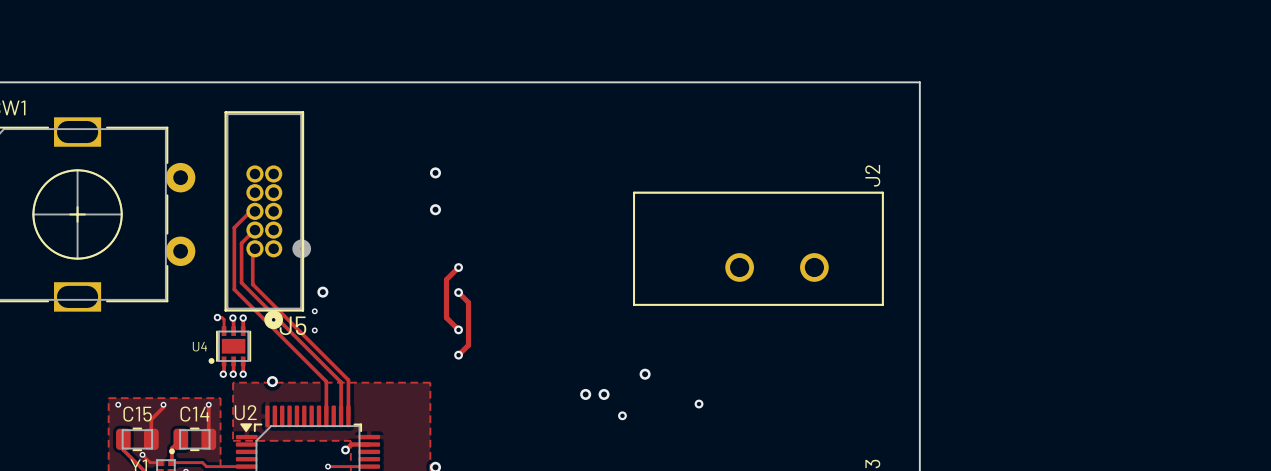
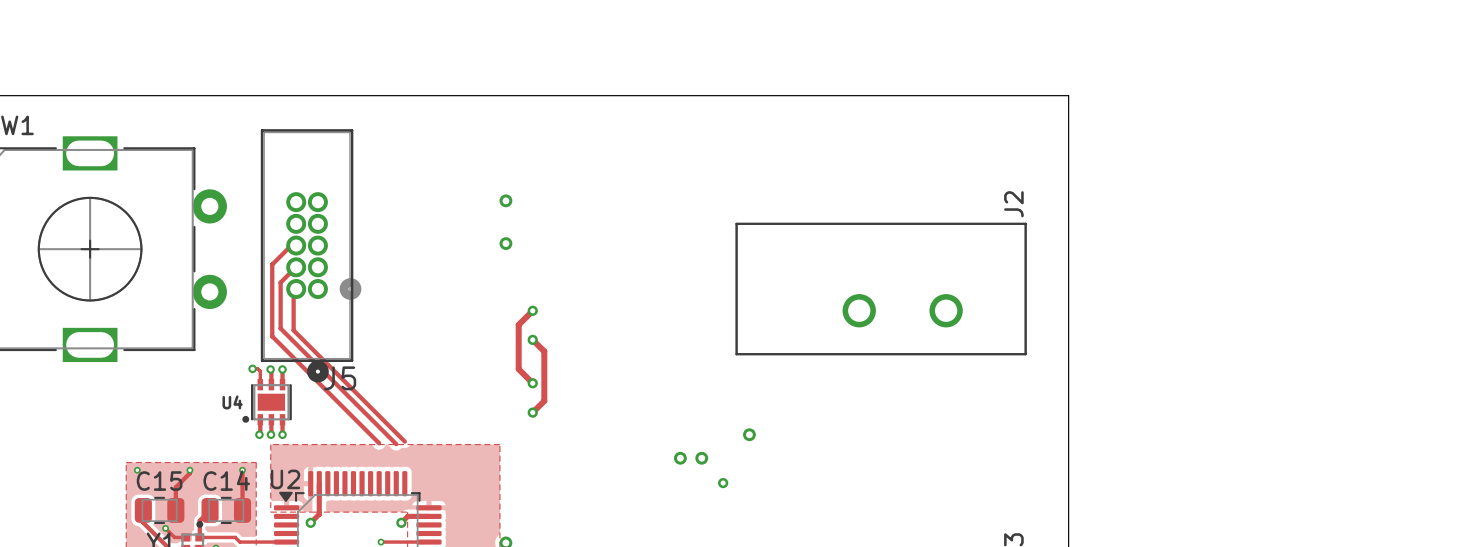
via: (322, 292) -> none
via: (314, 311) -> none
via: (314, 330) -> none
track: (348, 380) (348, 416) -> none
via: (272, 381) -> none
track: (326, 381) (326, 416) -> none
track: (341, 382) (341, 416) -> none
via: (699, 404) -> none
track: none -> (319, 483) (319, 514) (310, 522)
via: none -> (310, 522)

